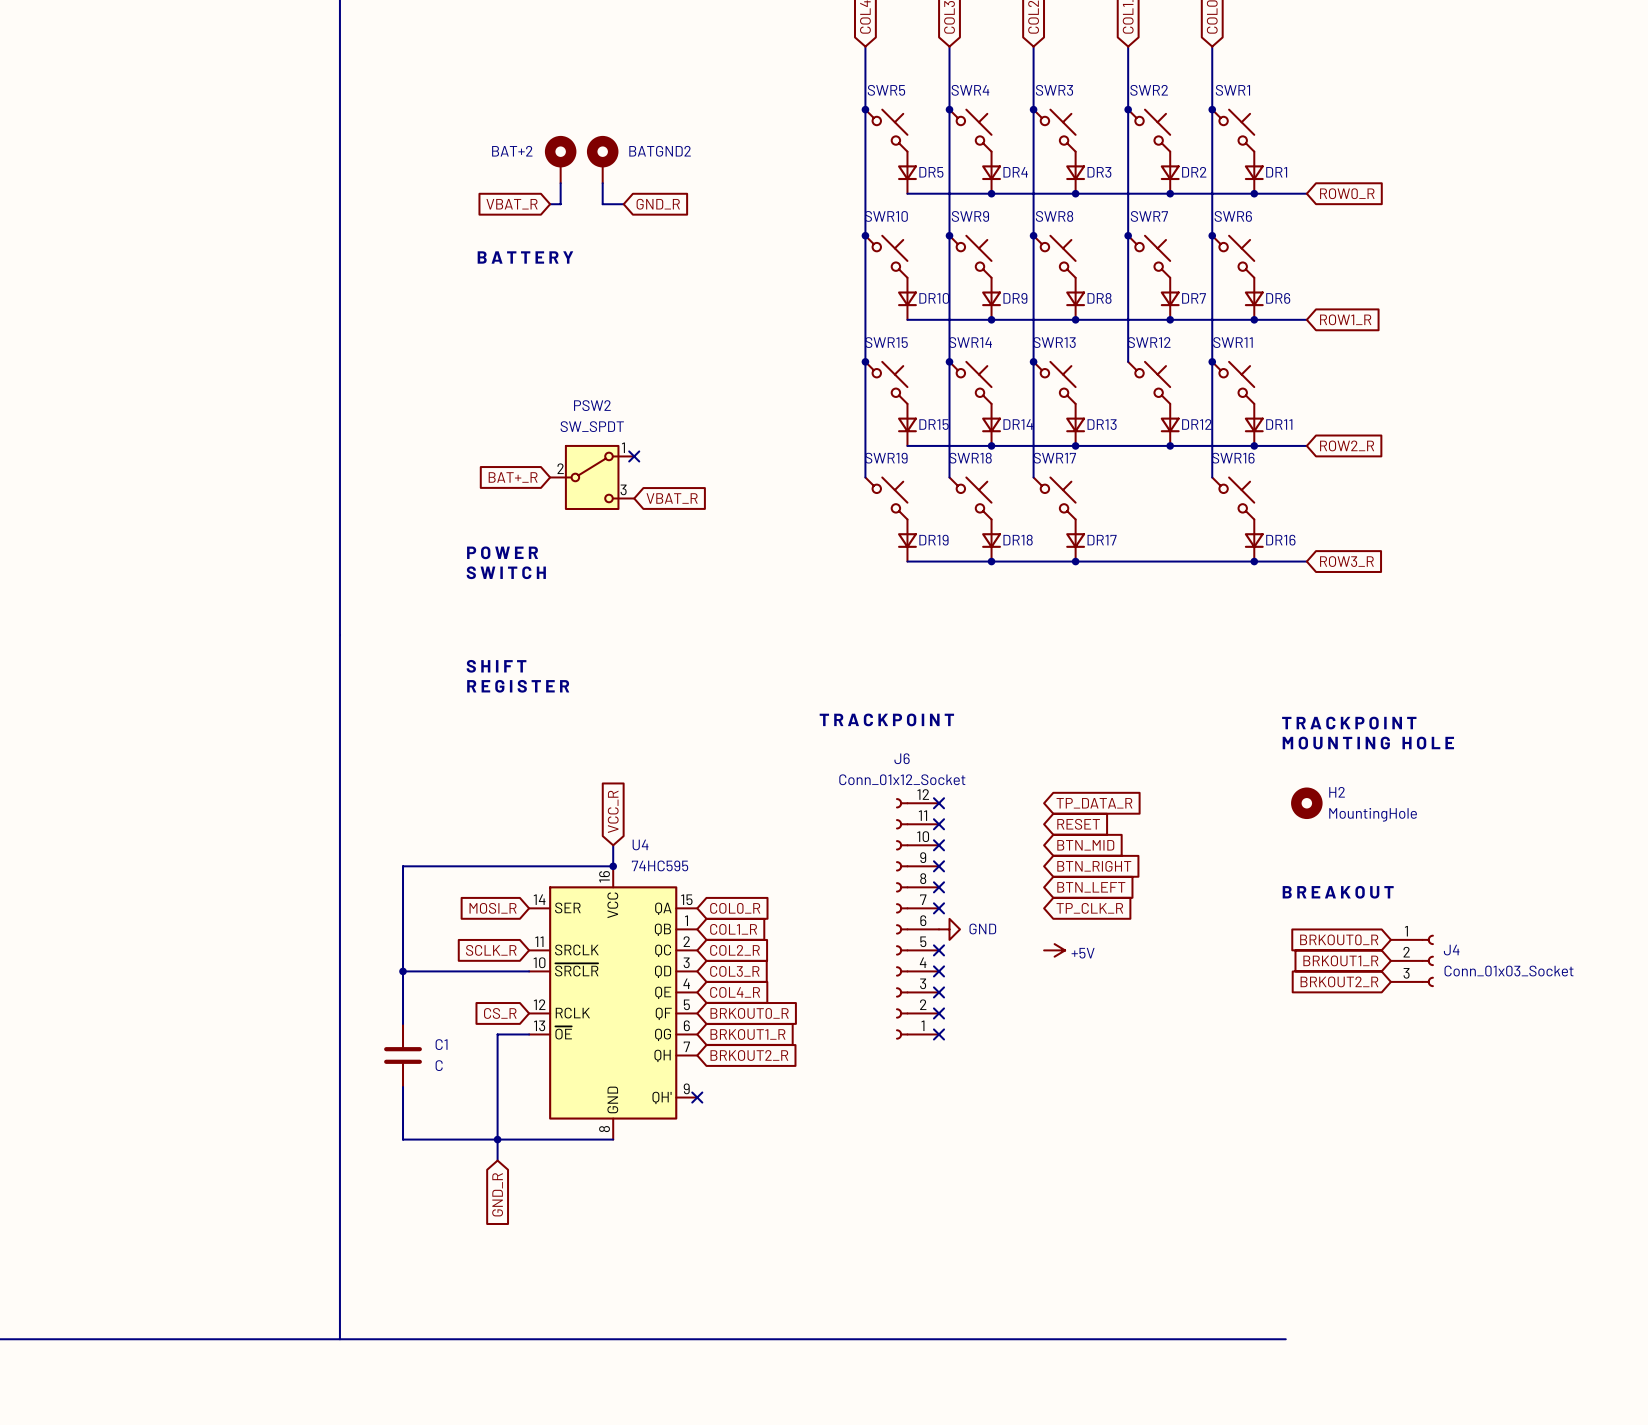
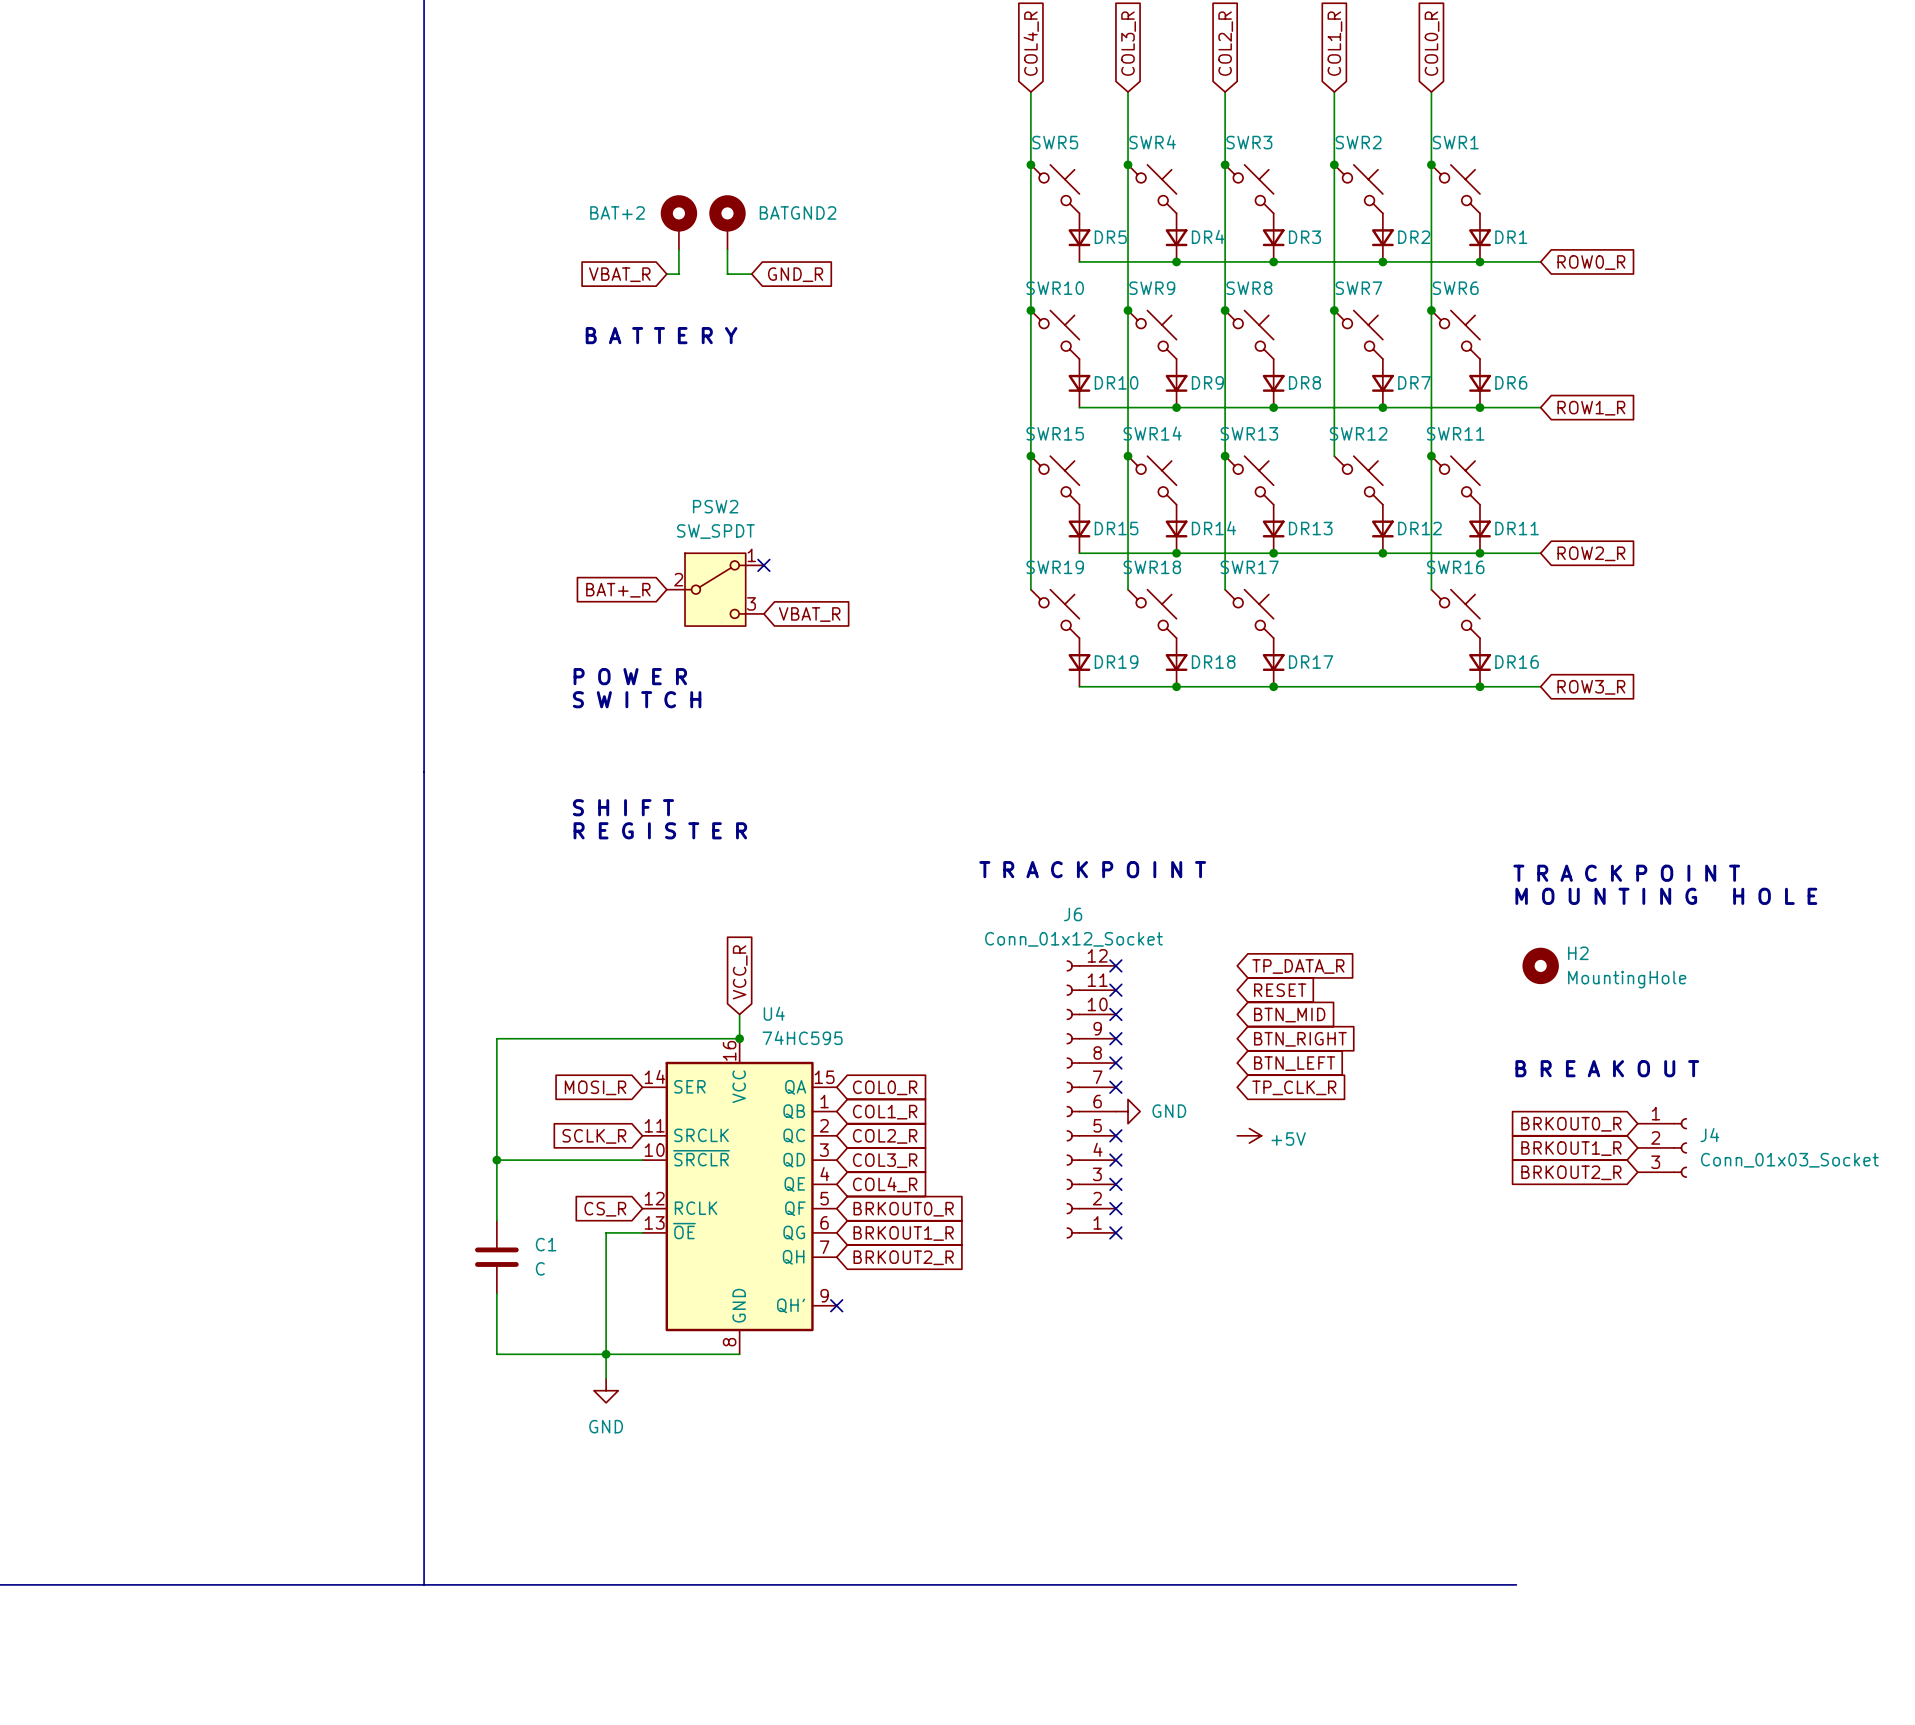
power symbol: none -> GND (606, 1390)
global label: GND_R (497, 1194) -> none

